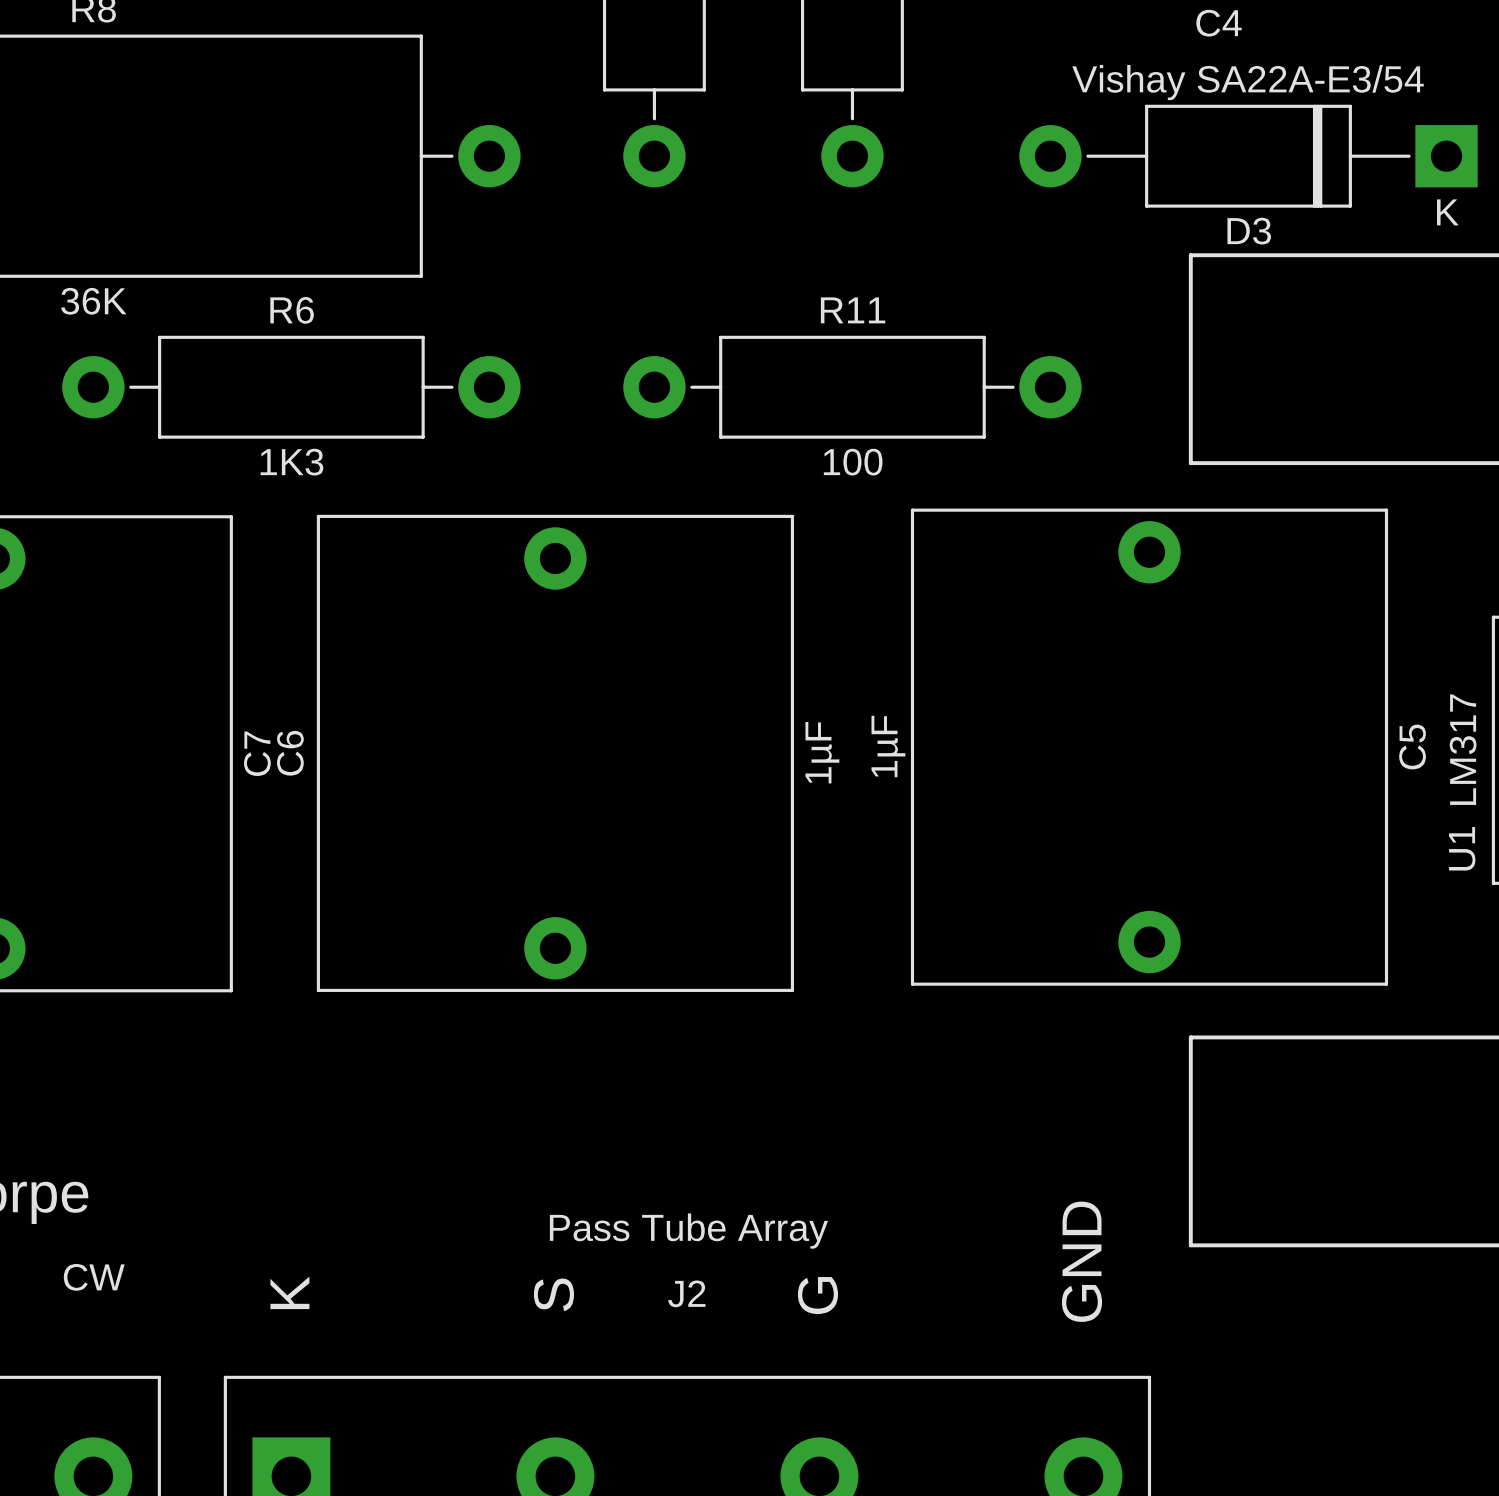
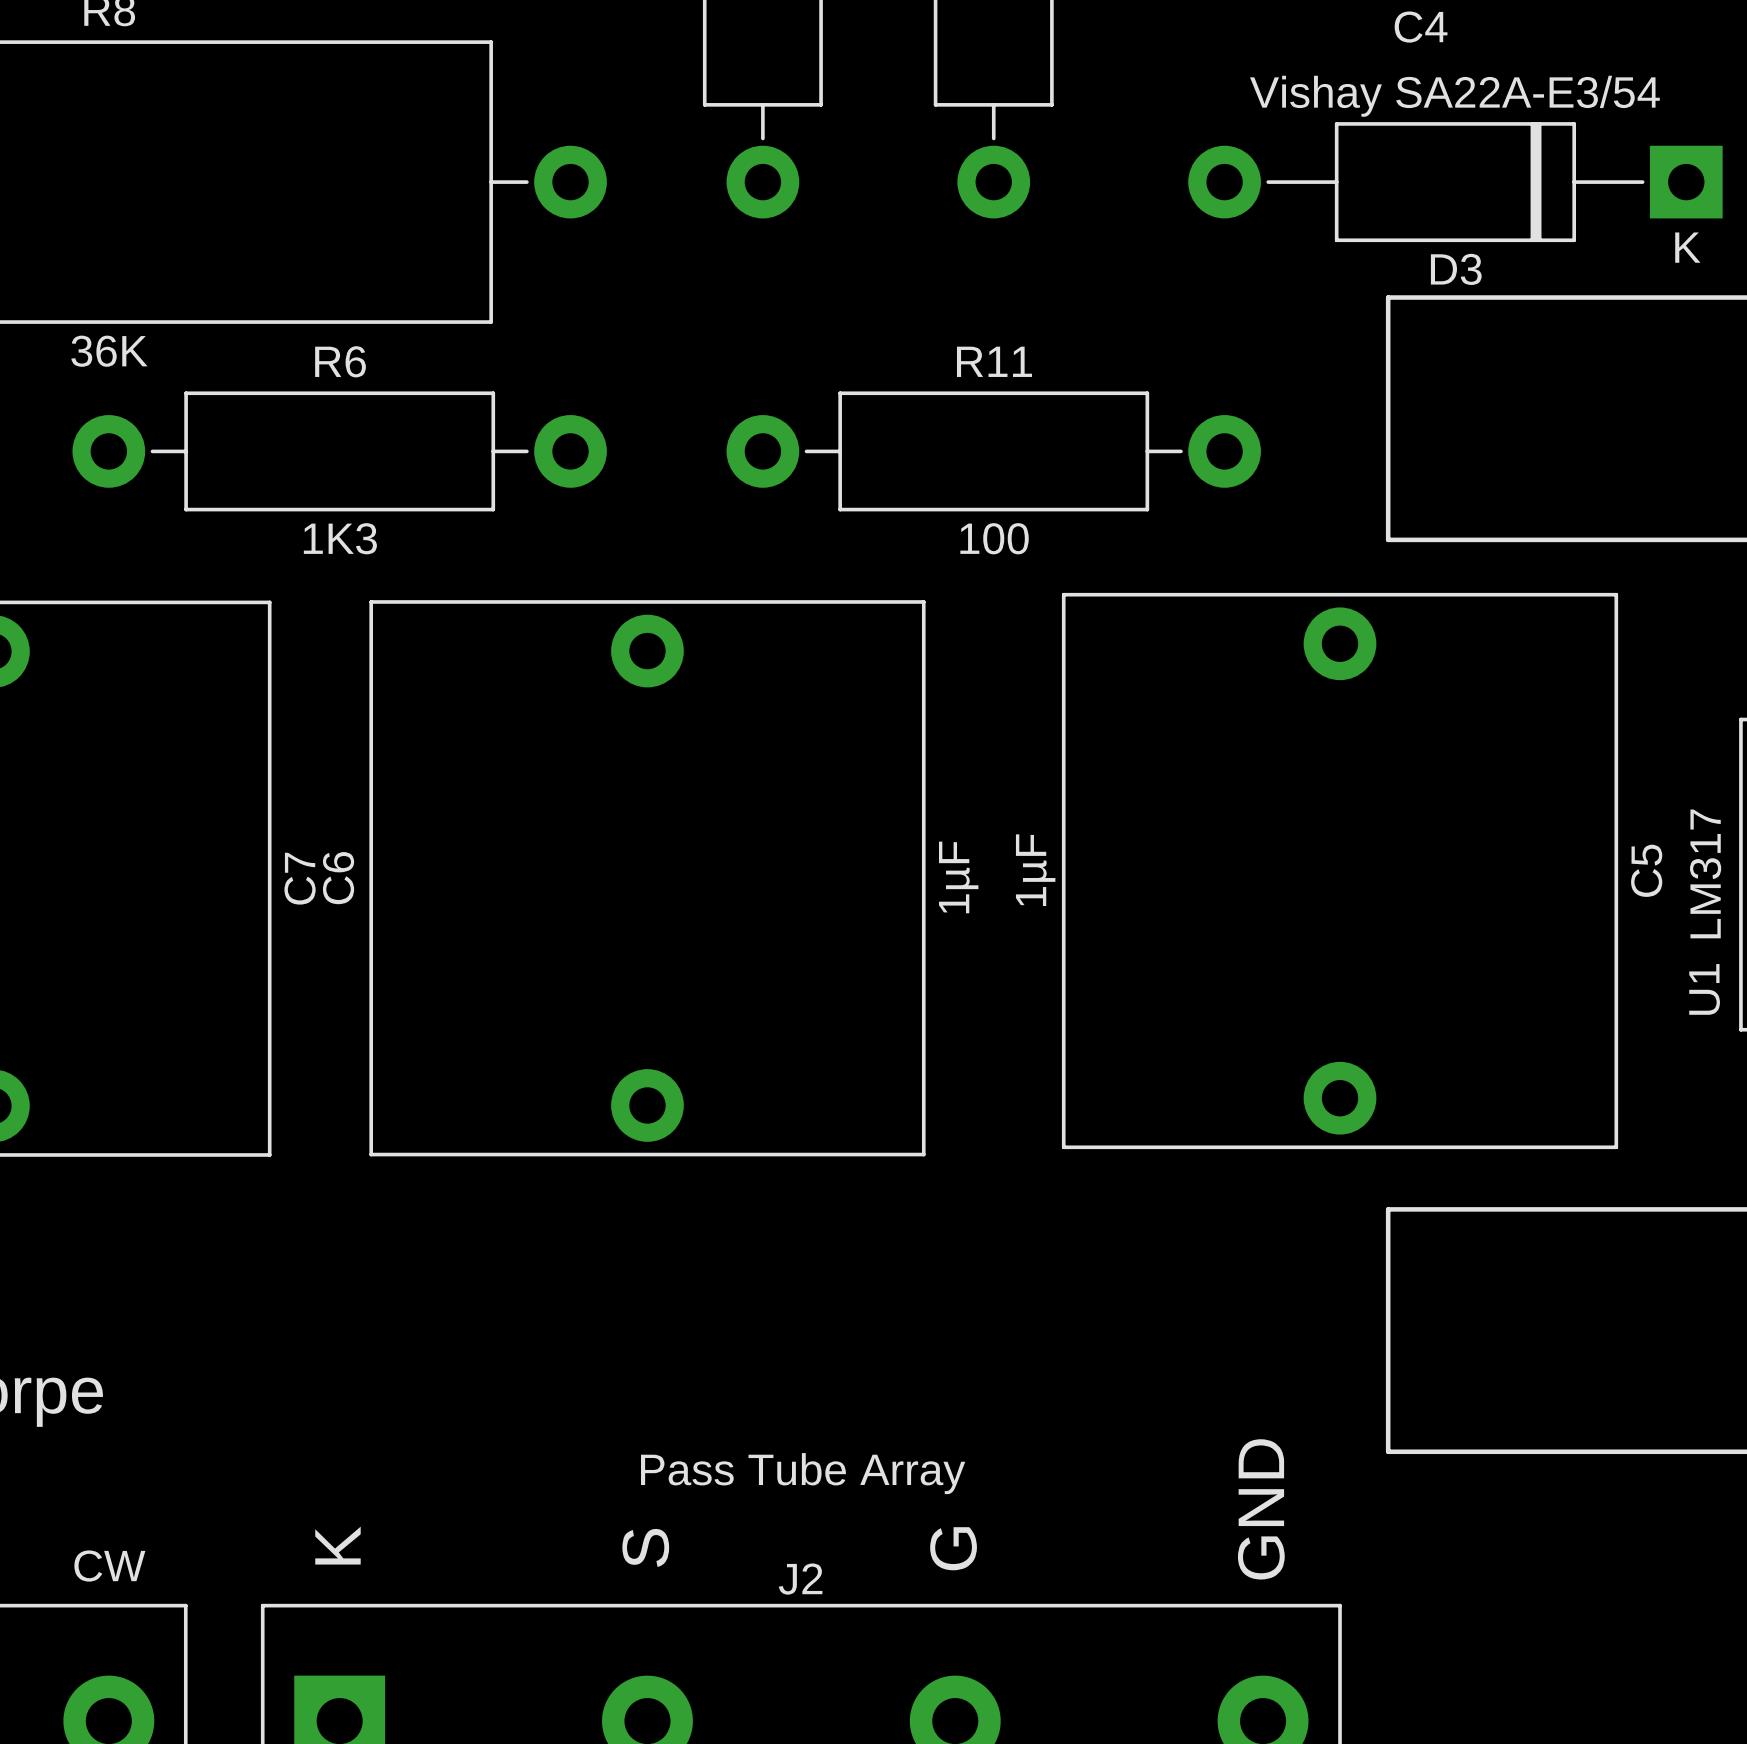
J2 value position: Pass Tube Array (688, 1231) -> Pass Tube Array (803, 1473)
text position: GND (1082, 1261) -> GND (1261, 1509)
text position: CW (94, 1277) -> CW (109, 1566)
text position: K (289, 1292) -> K (337, 1545)
J2 name position: J2 (686, 1293) -> J2 (800, 1579)
text position: S (553, 1294) -> S (645, 1547)
text position: G (817, 1295) -> G (953, 1548)

